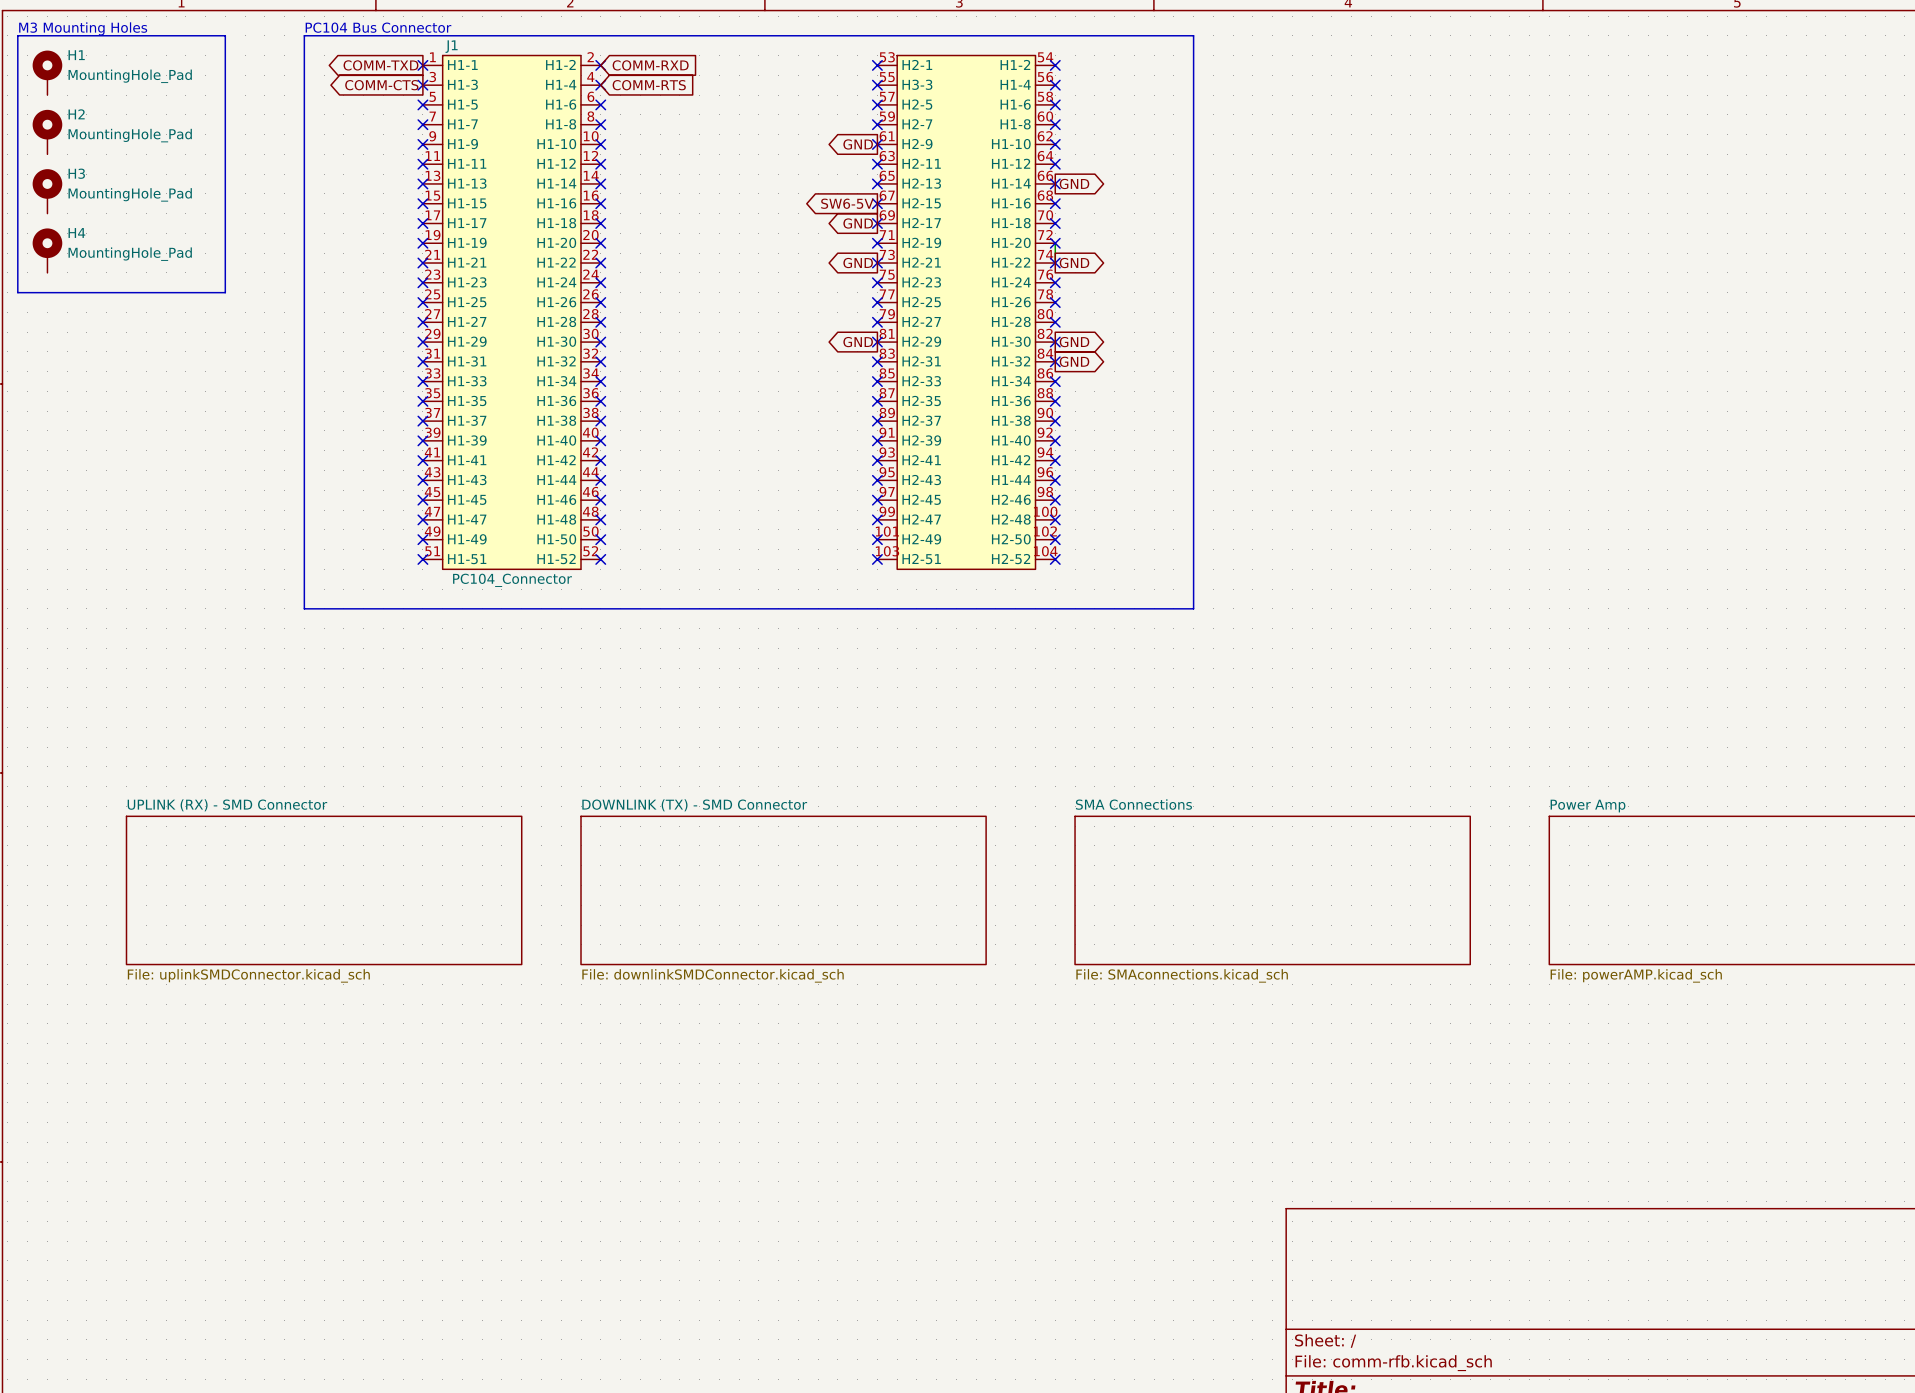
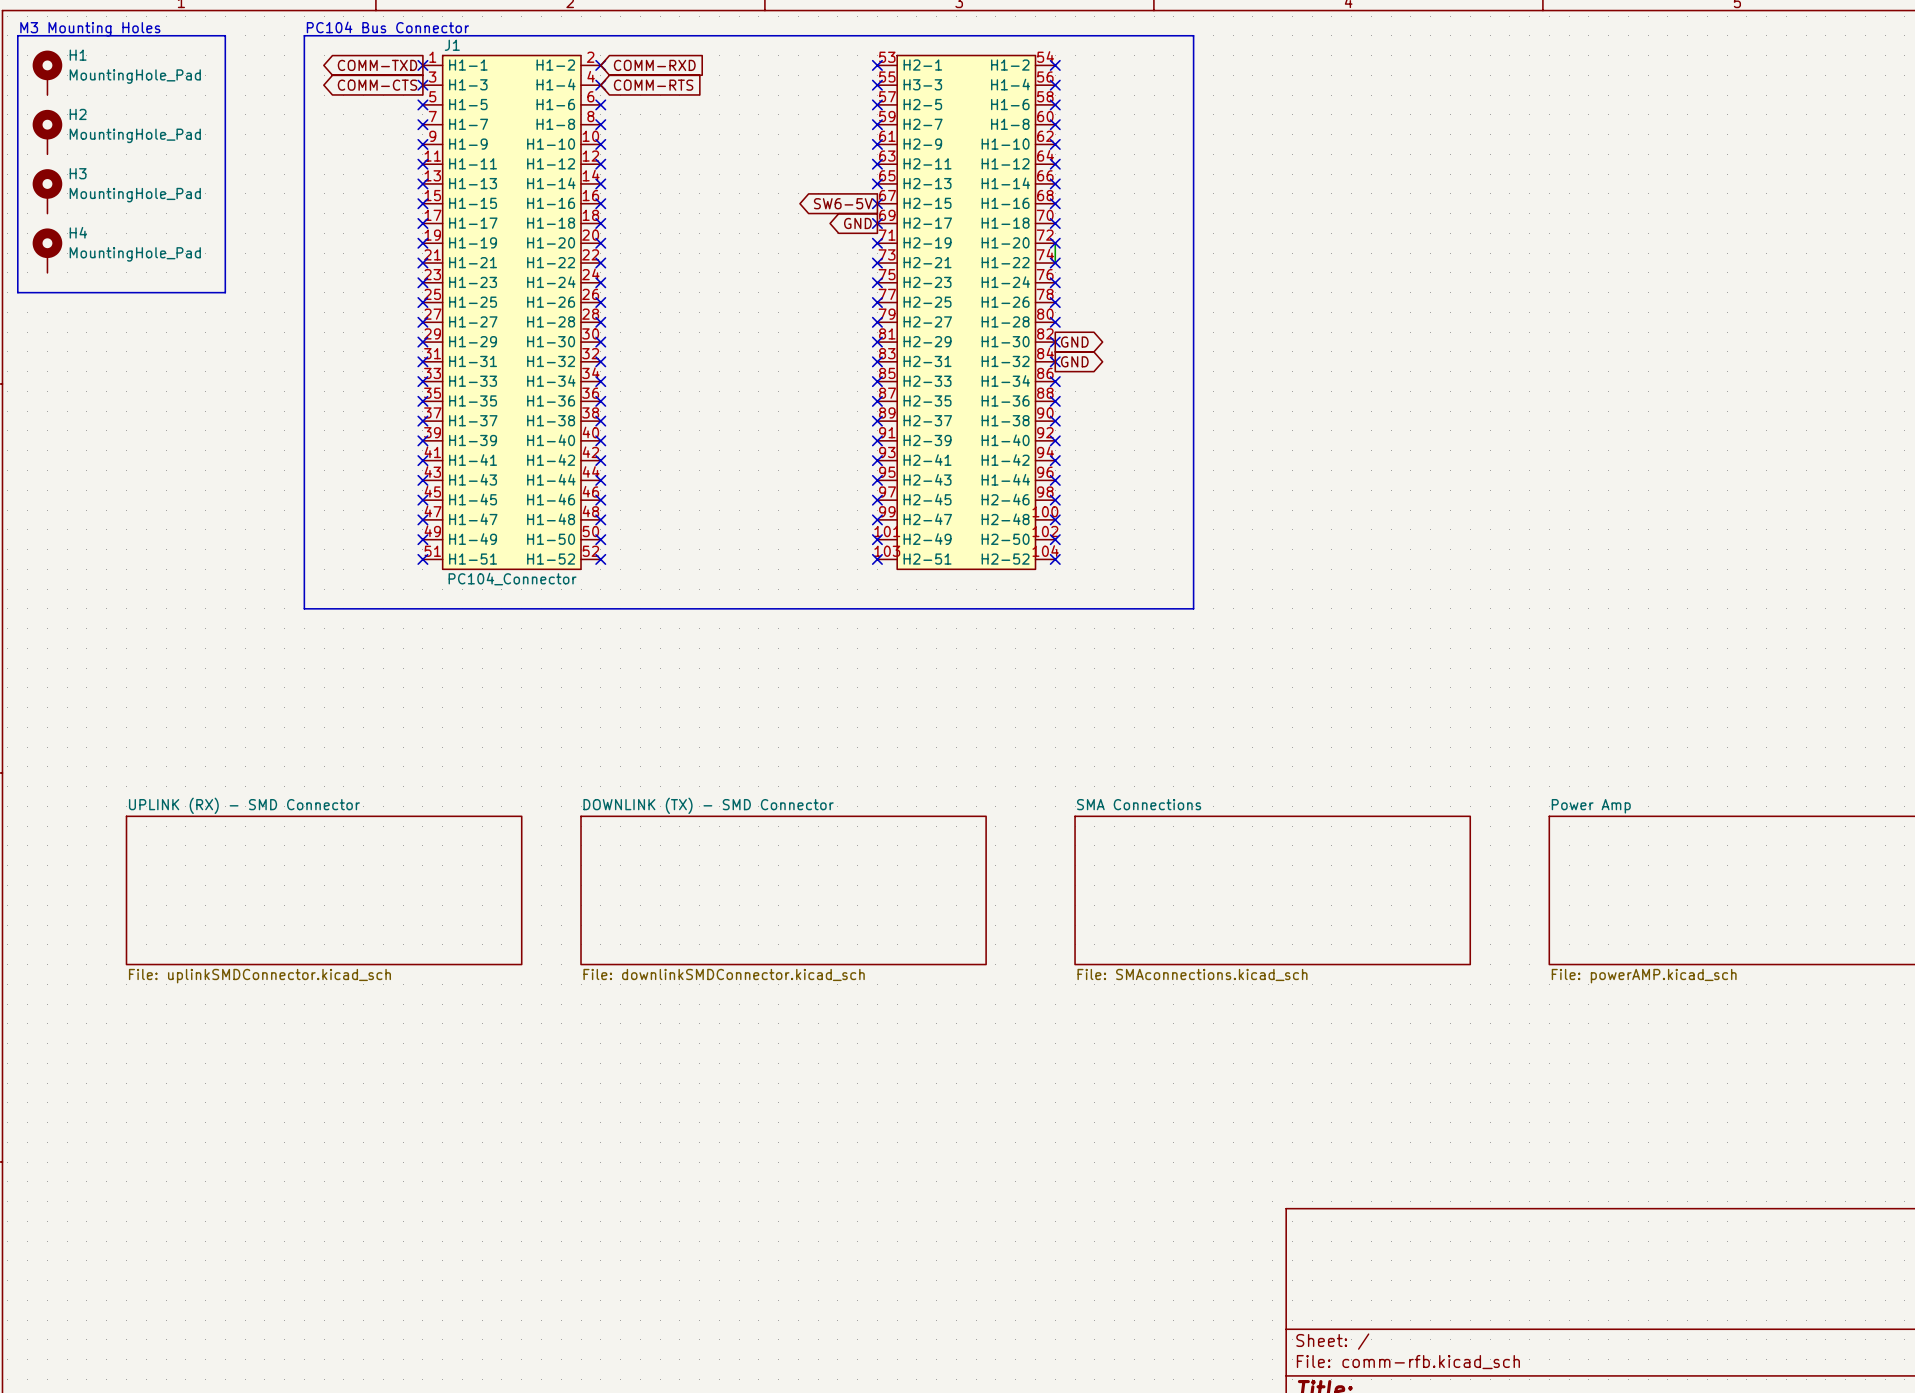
global label: GND (858, 144) -> none
global label: GND (1074, 183) -> none
global label: GND (858, 263) -> none
global label: GND (1074, 263) -> none
global label: GND (858, 342) -> none

